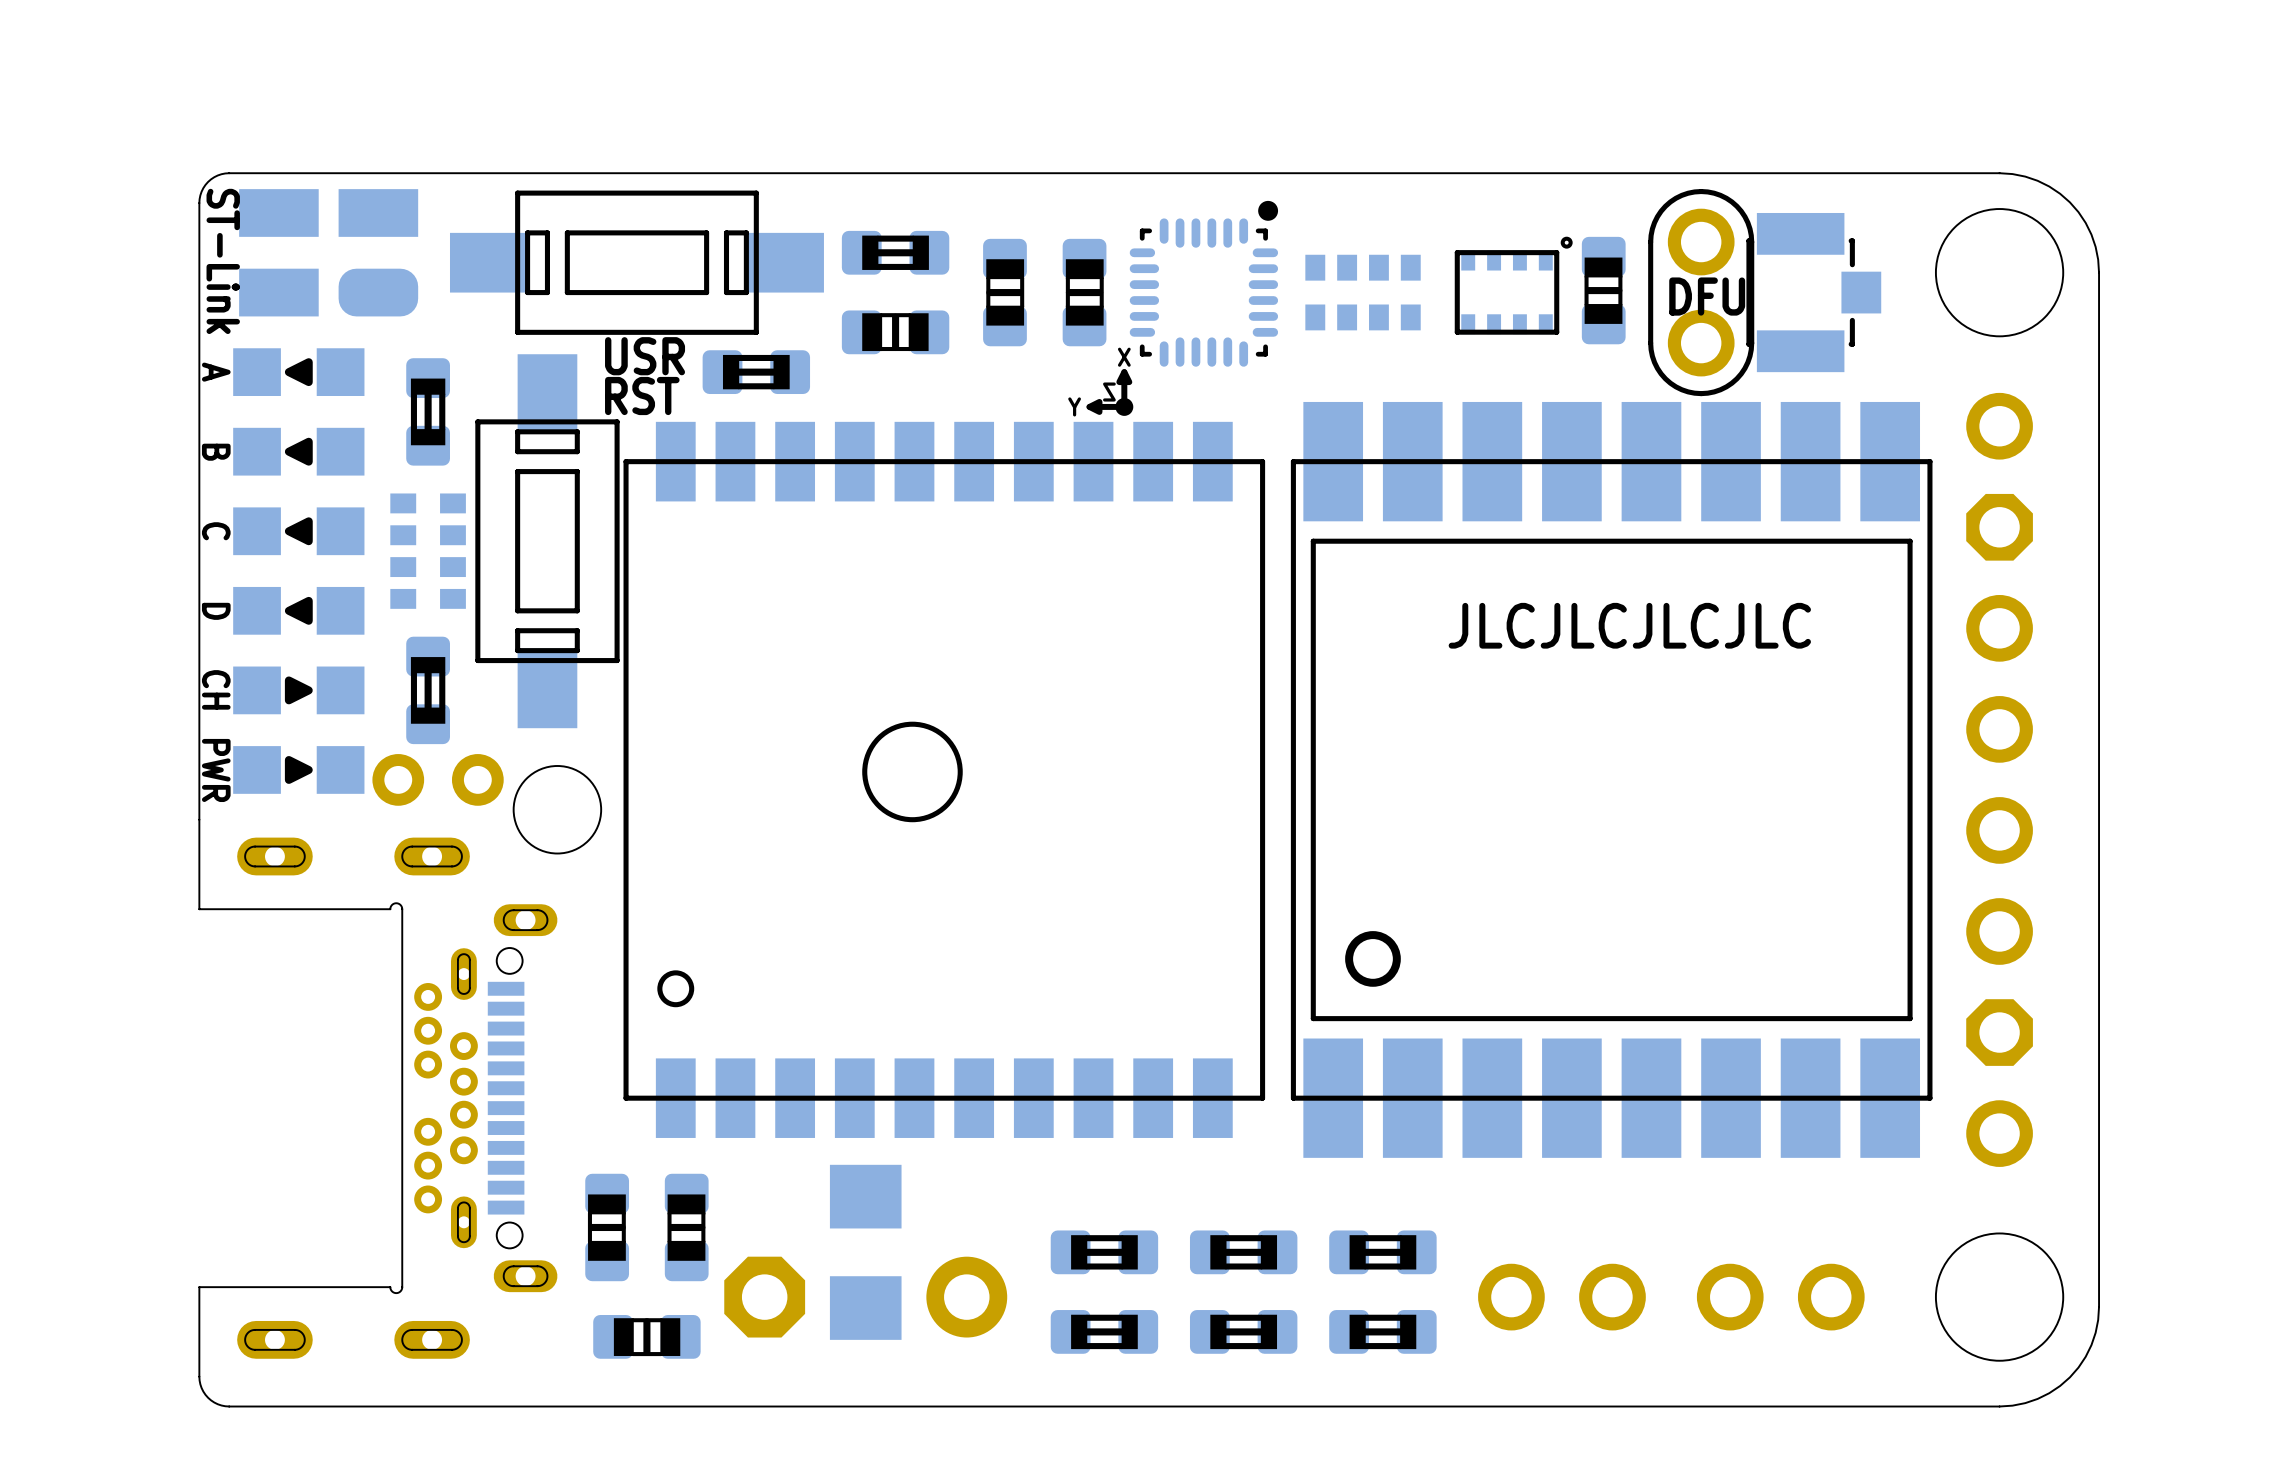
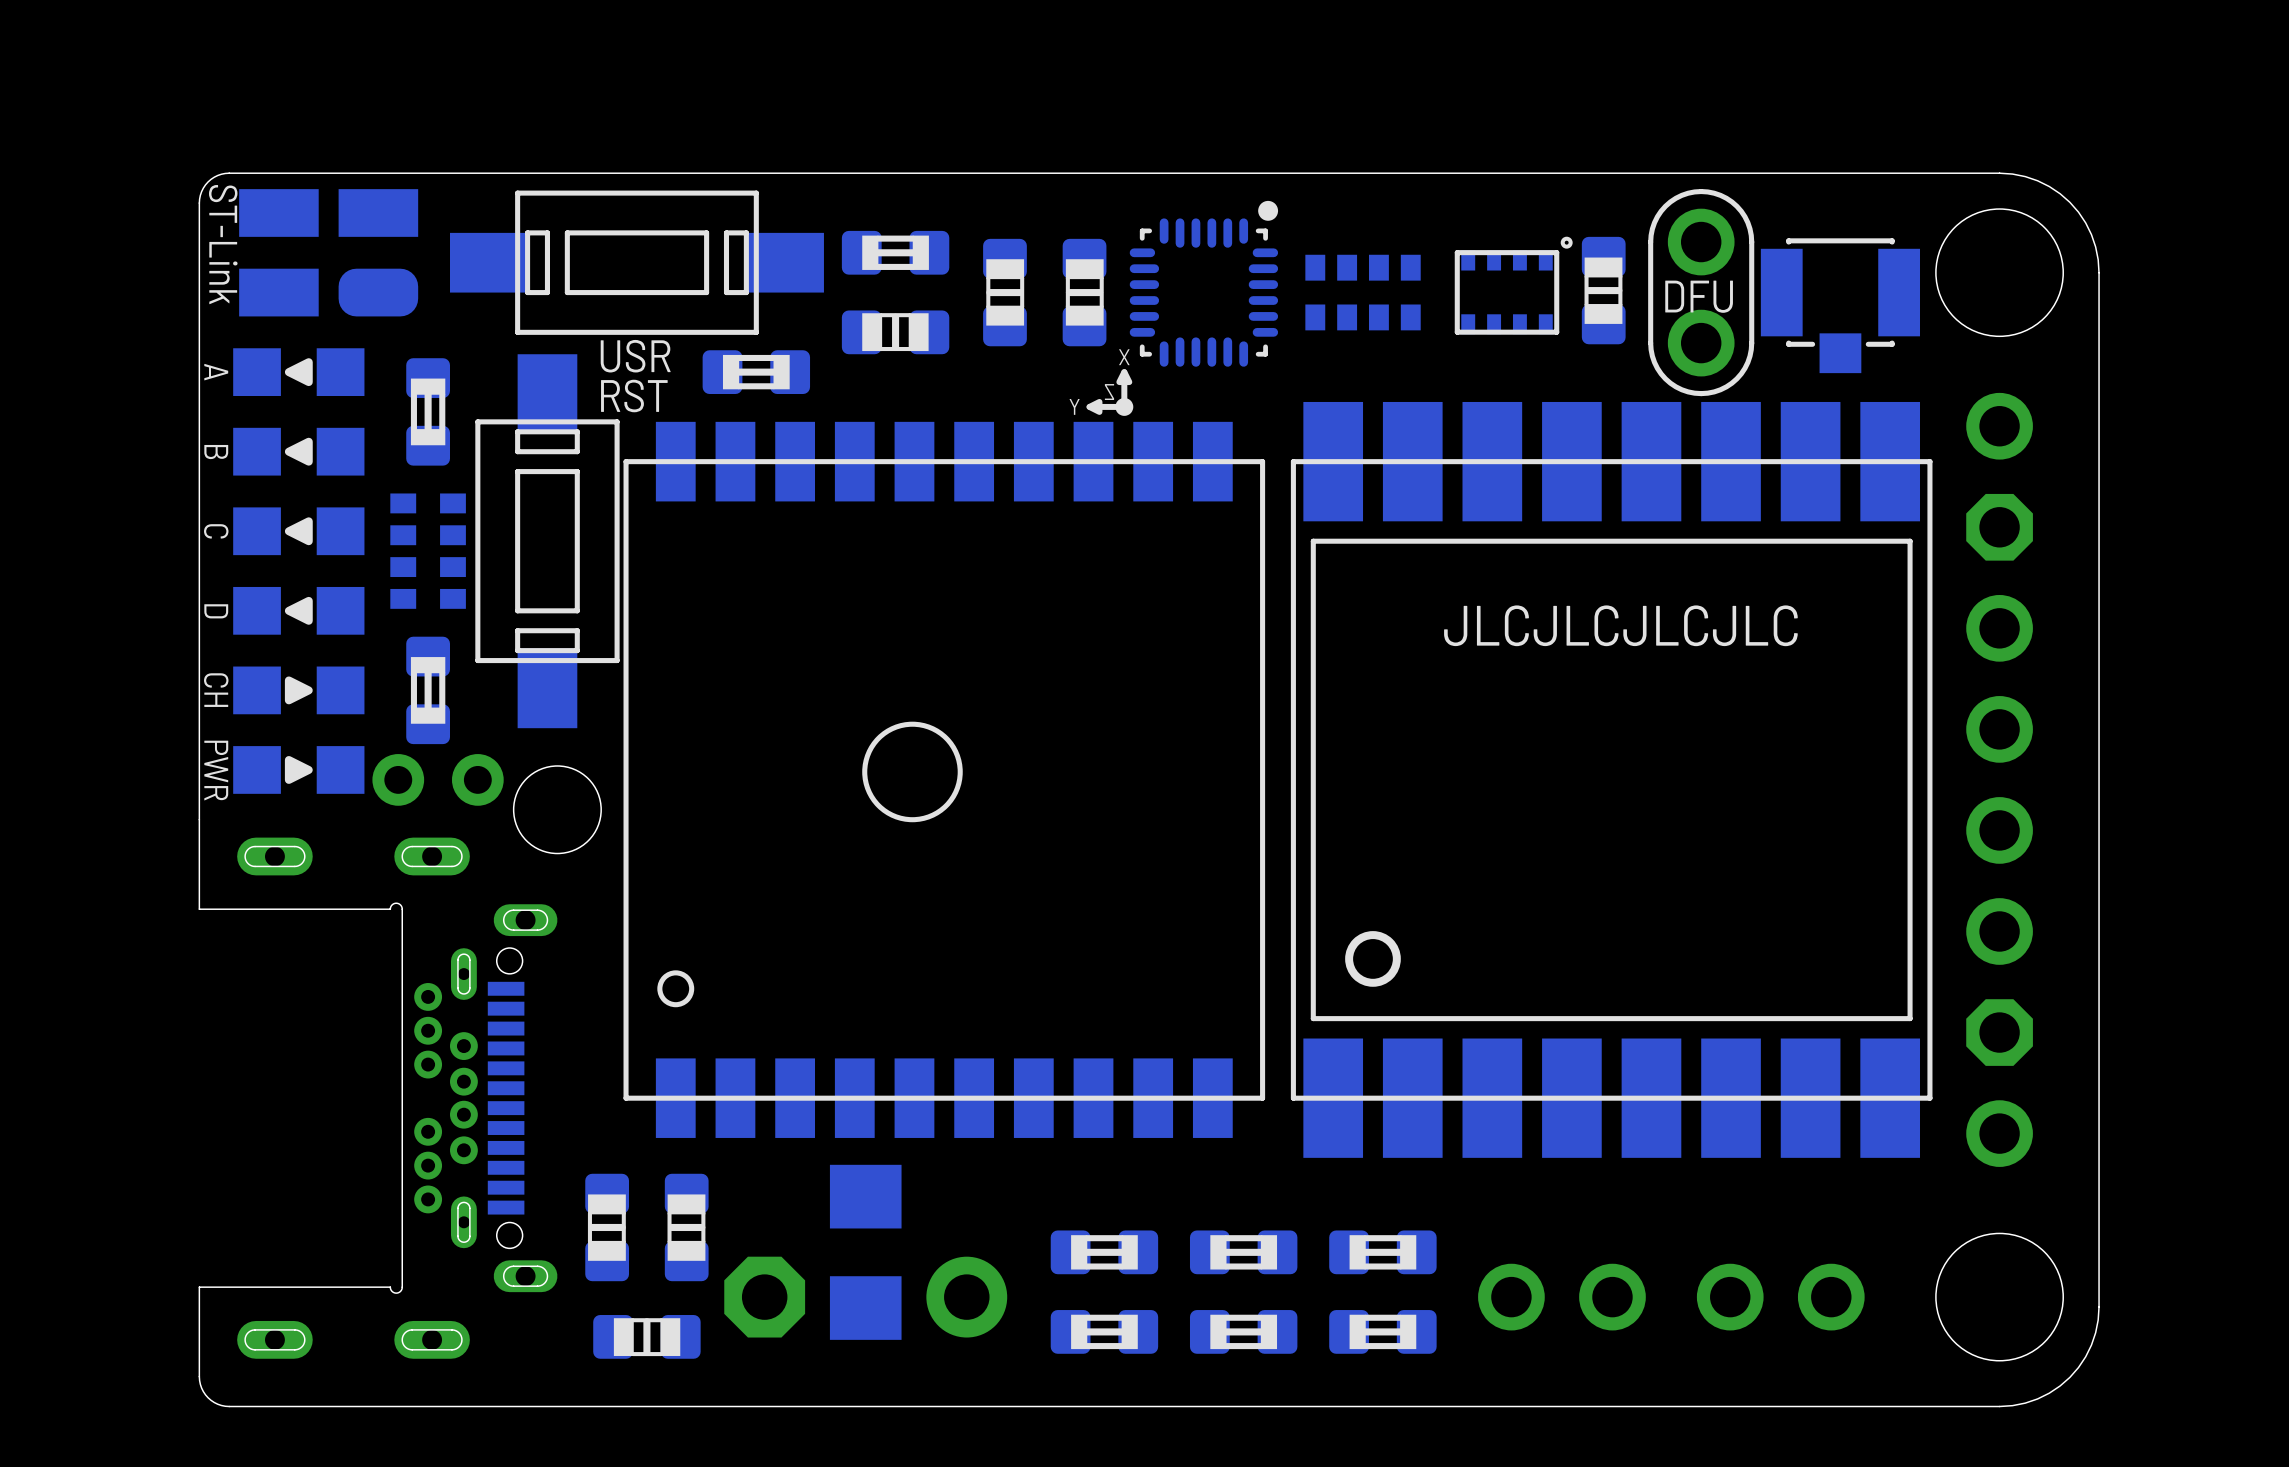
part rotation: 0° (1813, 292) -> 90° clockwise (1840, 305)

